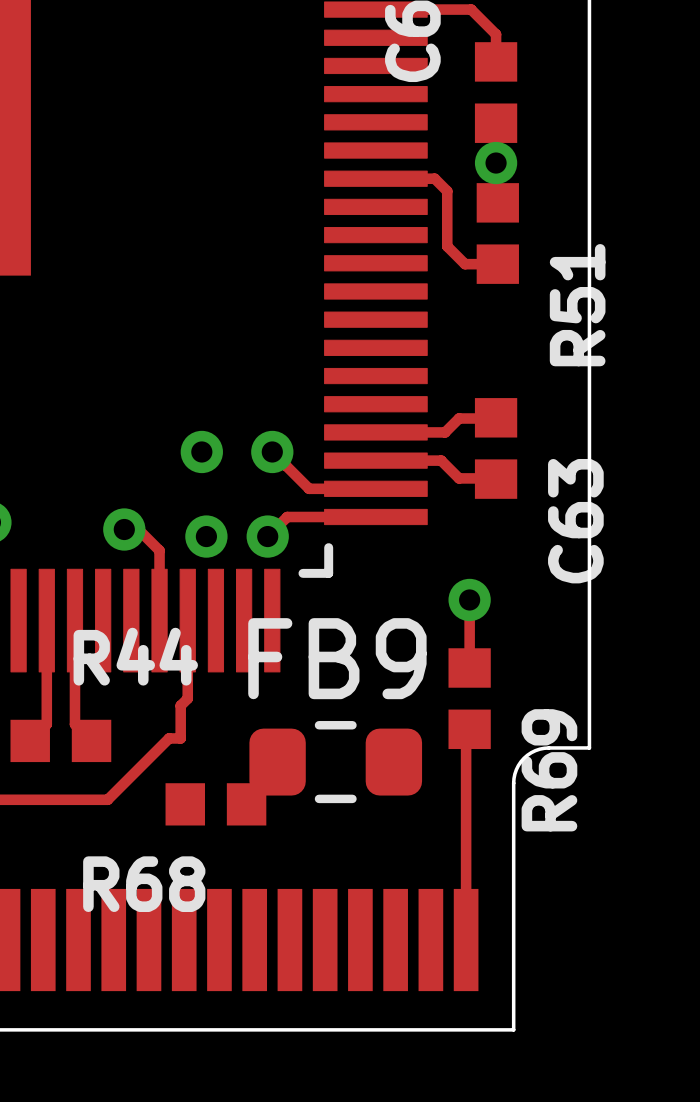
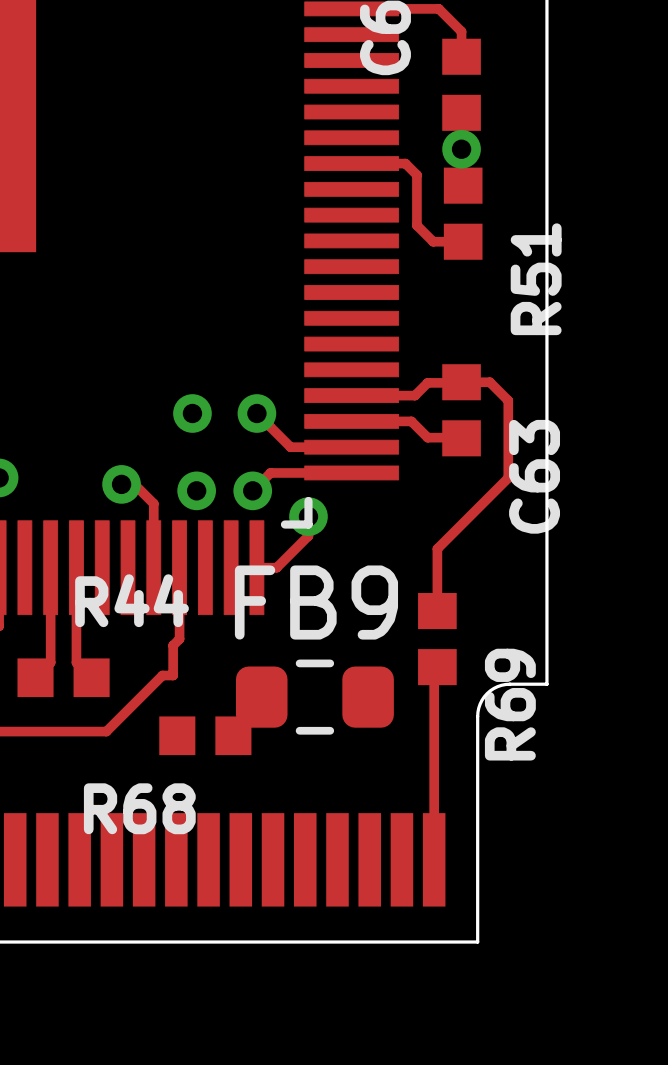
track: none -> (461, 382) (489, 382) (508, 400) (508, 477) (437, 548)
track: none -> (308, 516) (308, 535) (276, 567) (256, 567)
via position: (469, 599) -> (308, 516)

